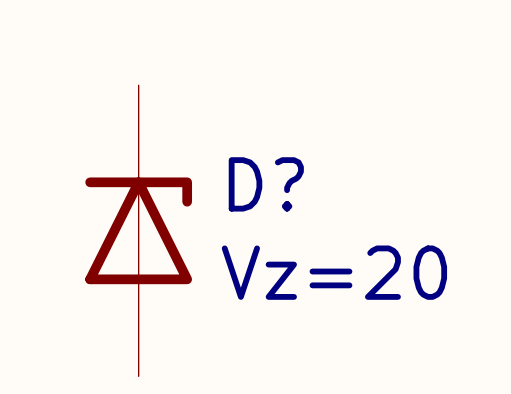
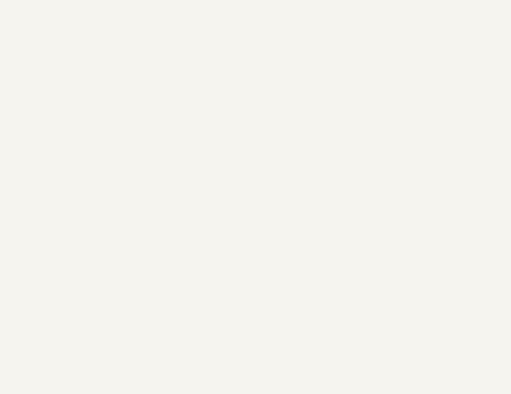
D?: Vz=20 (138, 230) -> none

